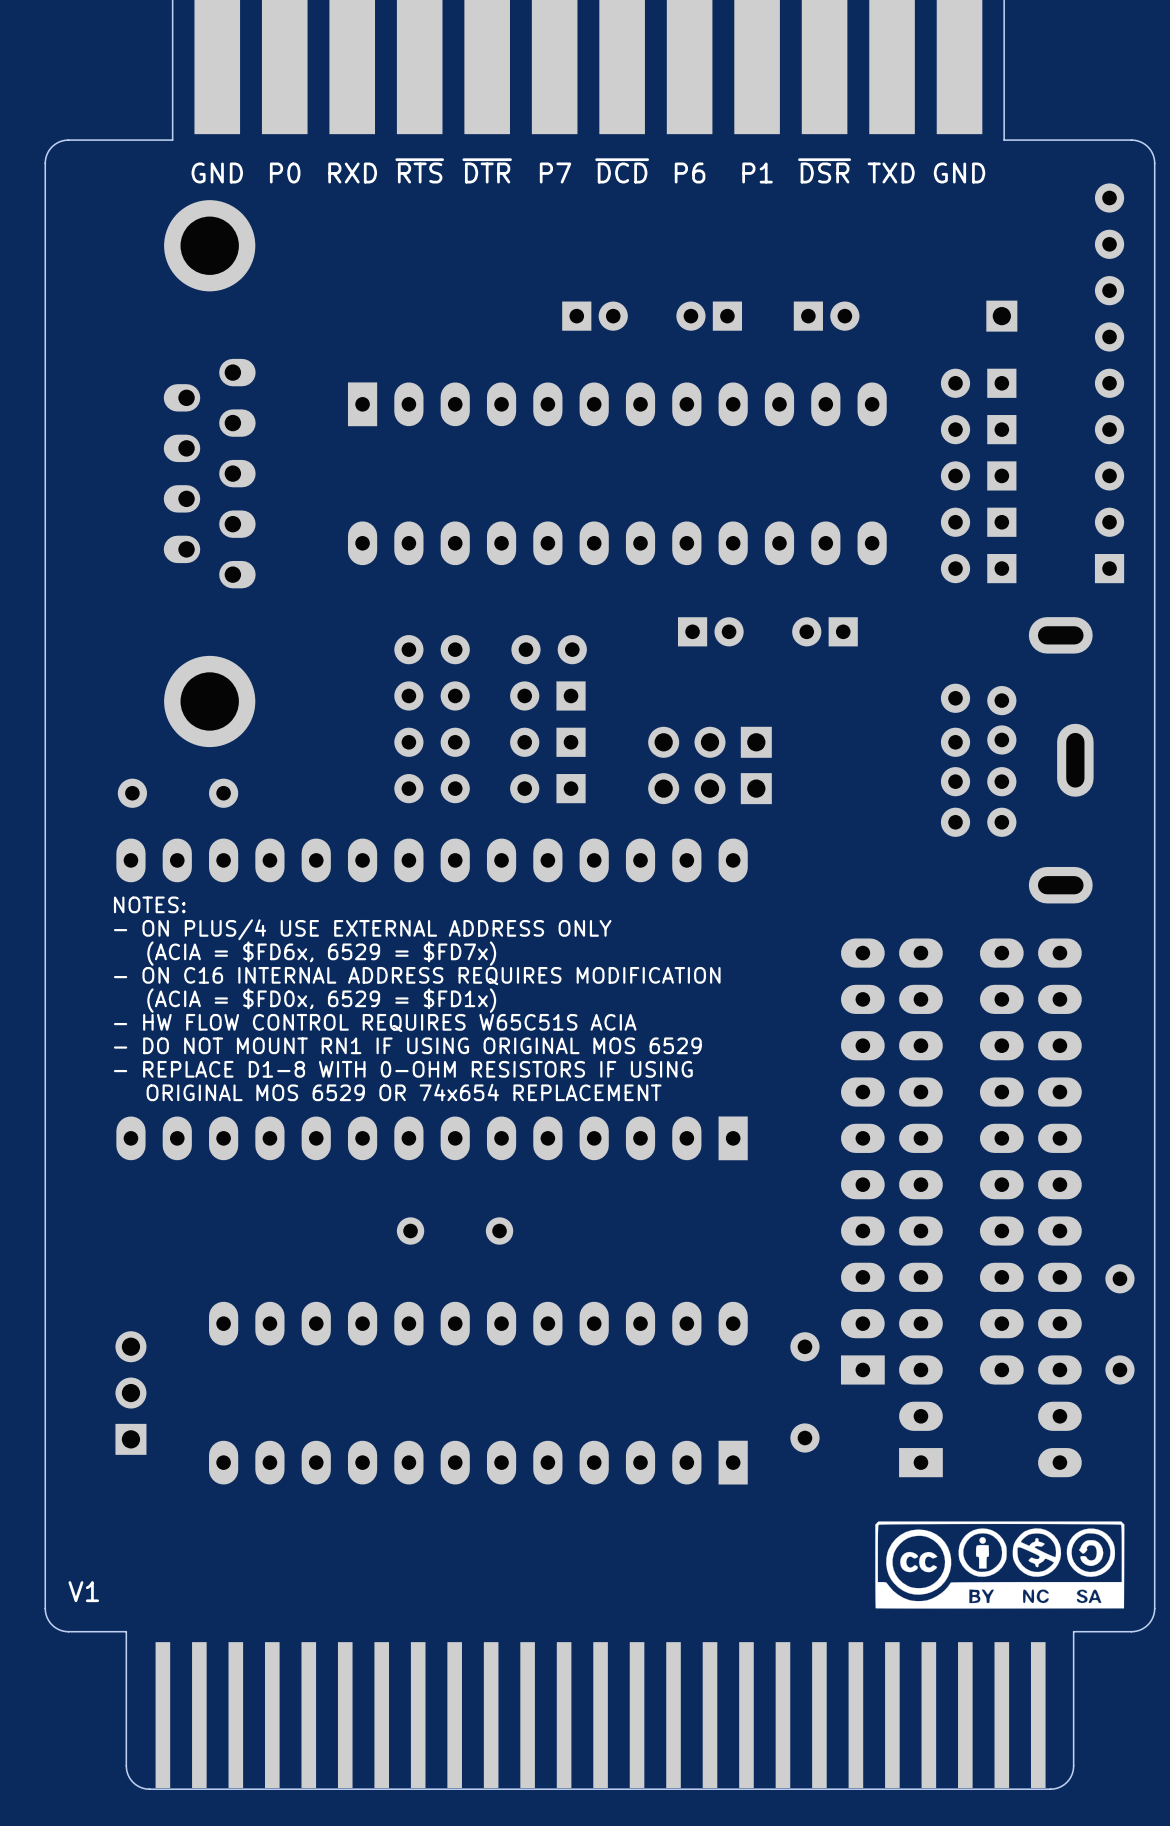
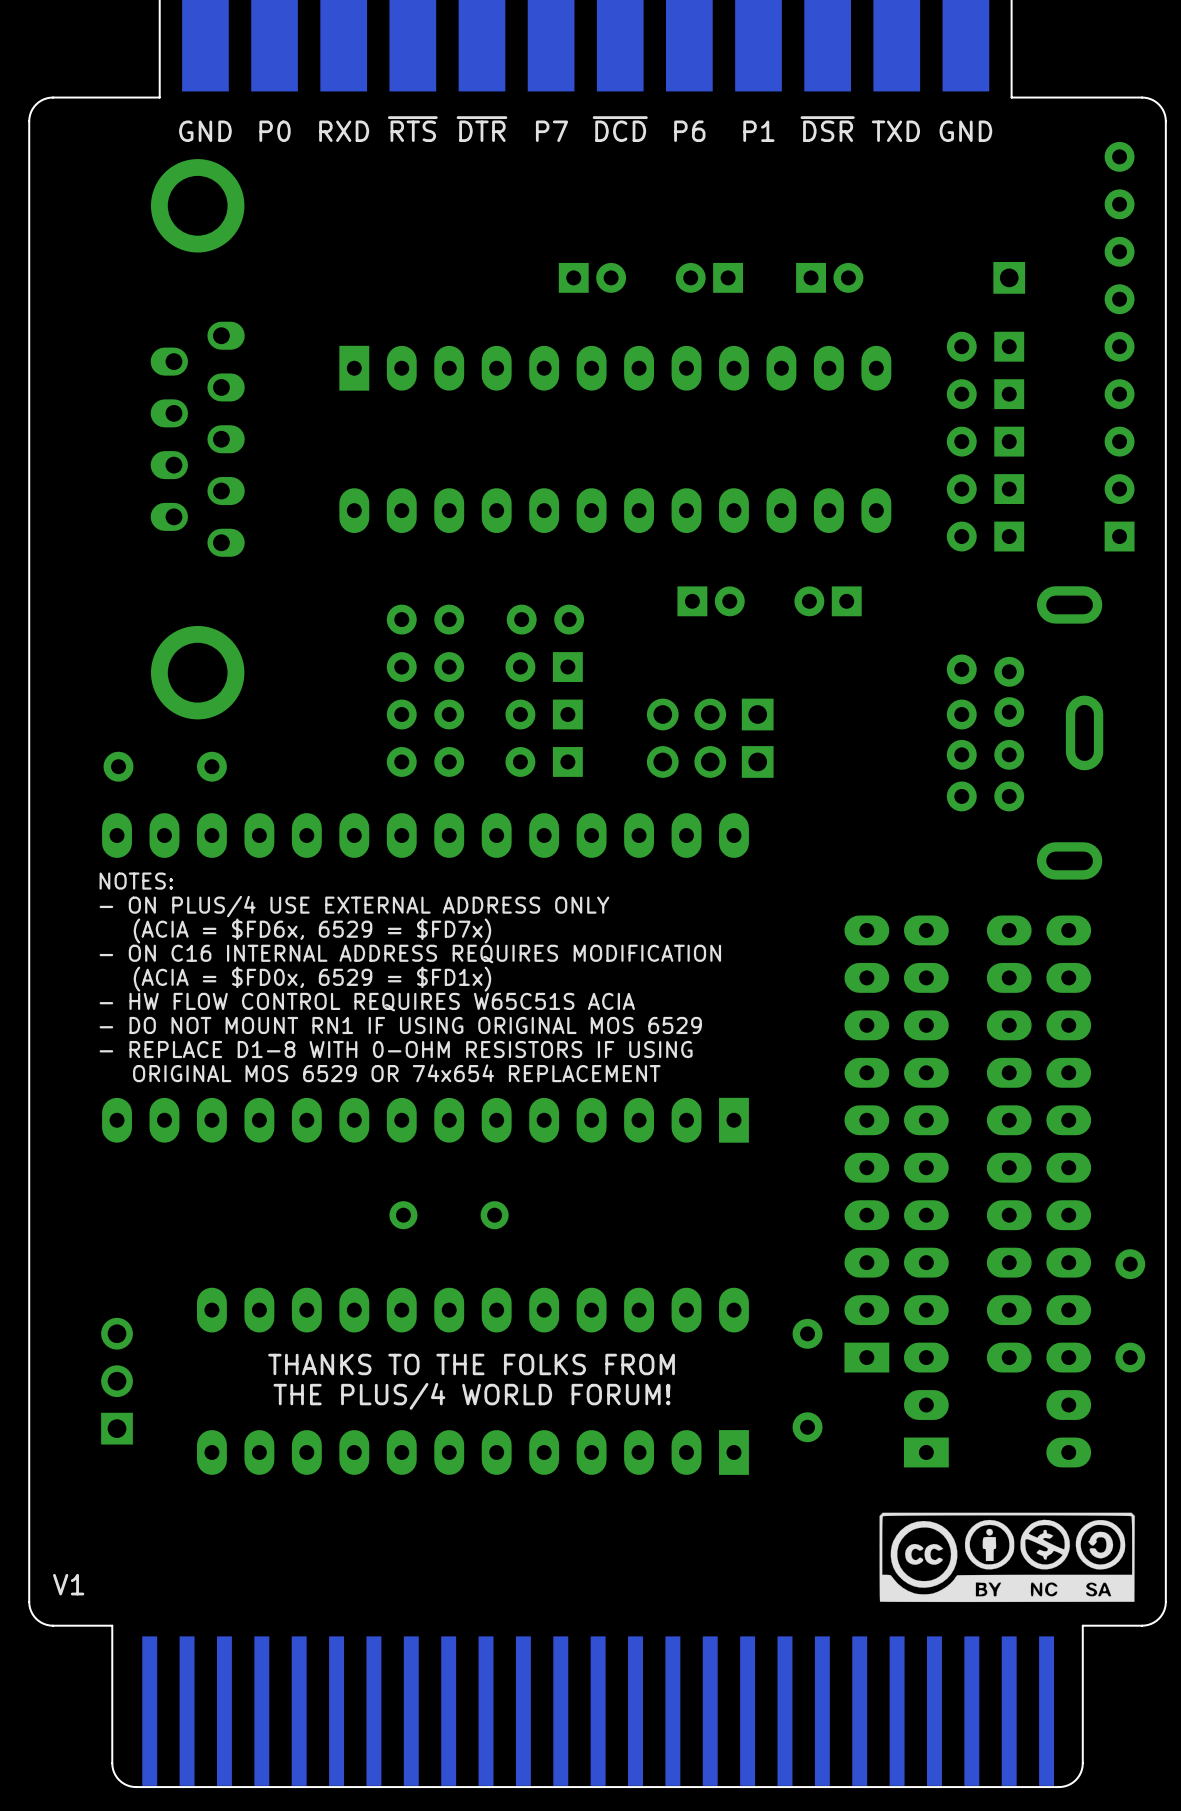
text: none -> THANKS TO THE FOLKS FROM (471, 1364)
text: none -> THE PLUS/4 WORLD FORUM! (471, 1396)

